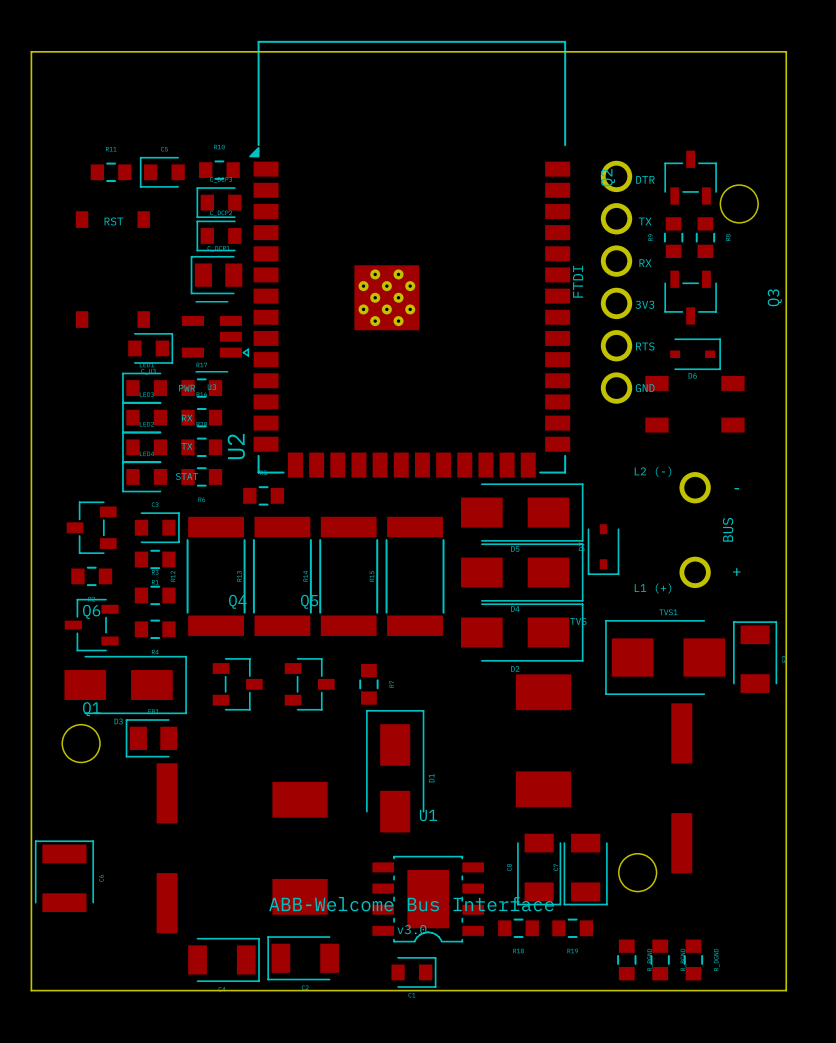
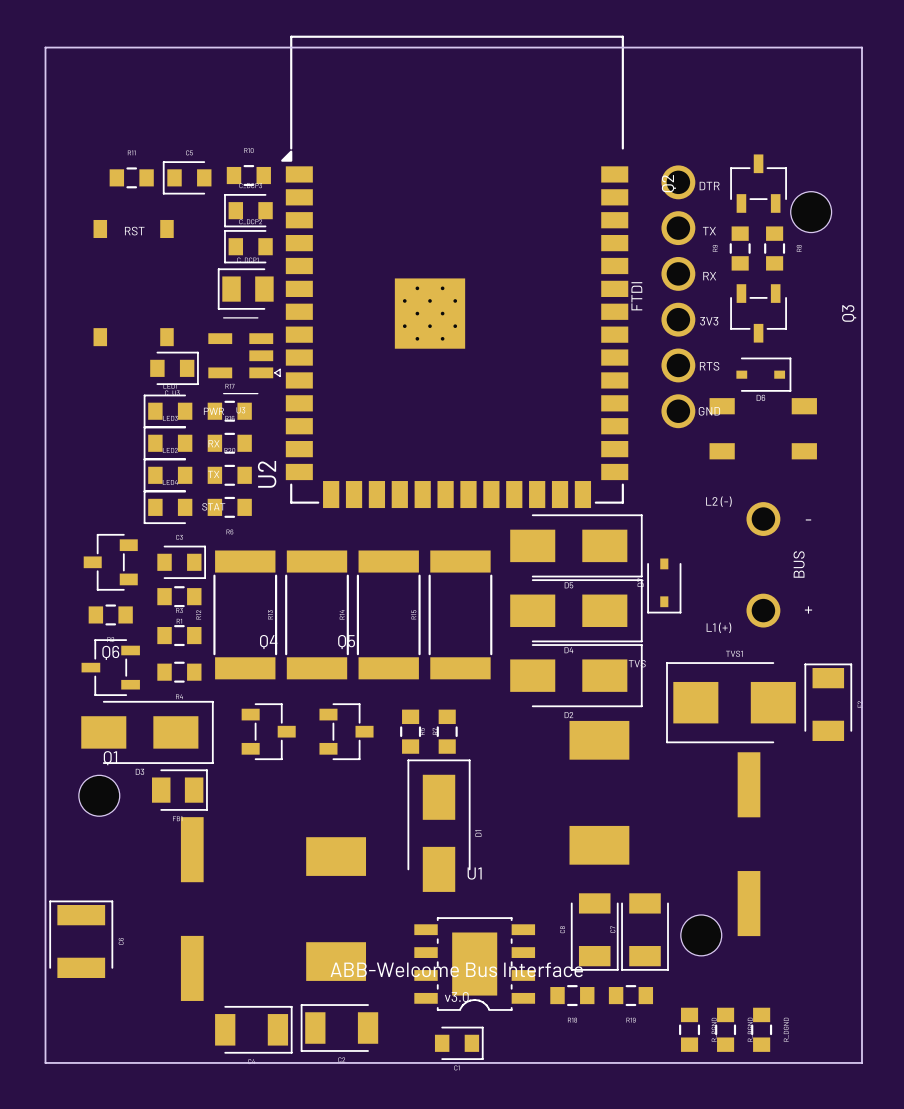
part rotation: 0° (263, 495) -> 90° clockwise (447, 731)
part position: (263, 495) -> (447, 731)
part rotation: 0° (151, 738) -> 180° (179, 790)

